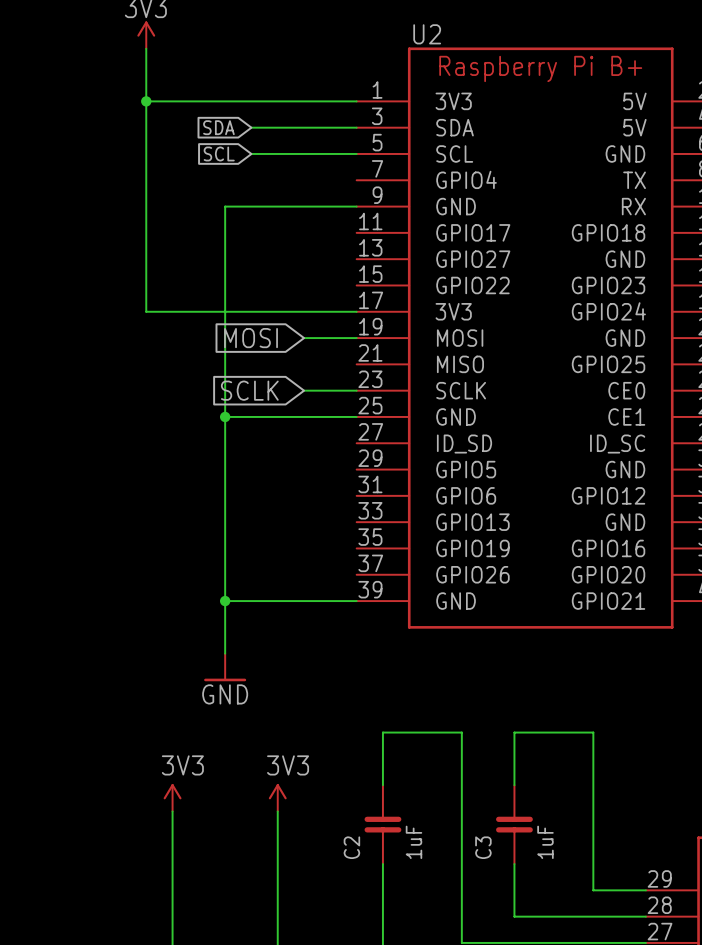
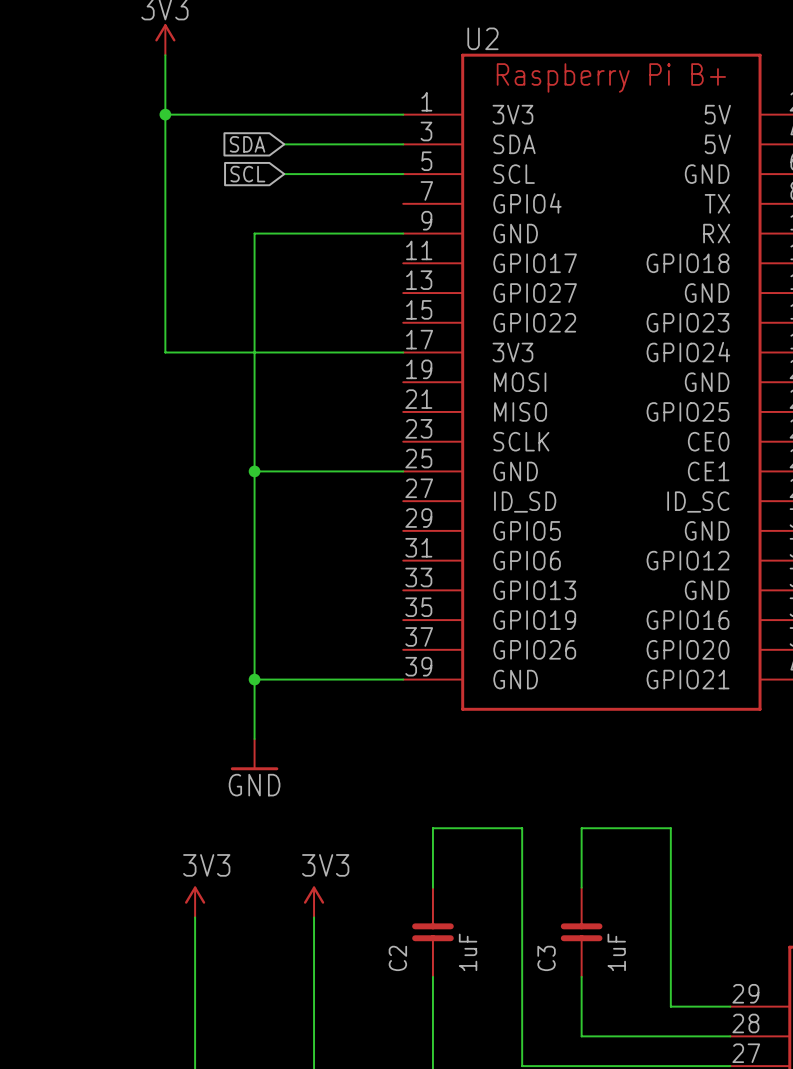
global label: MOSI (251, 338) -> none
wire: (304, 338) (356, 338) -> none
global label: SCLK (249, 390) -> none
wire: (304, 390) (356, 390) -> none

